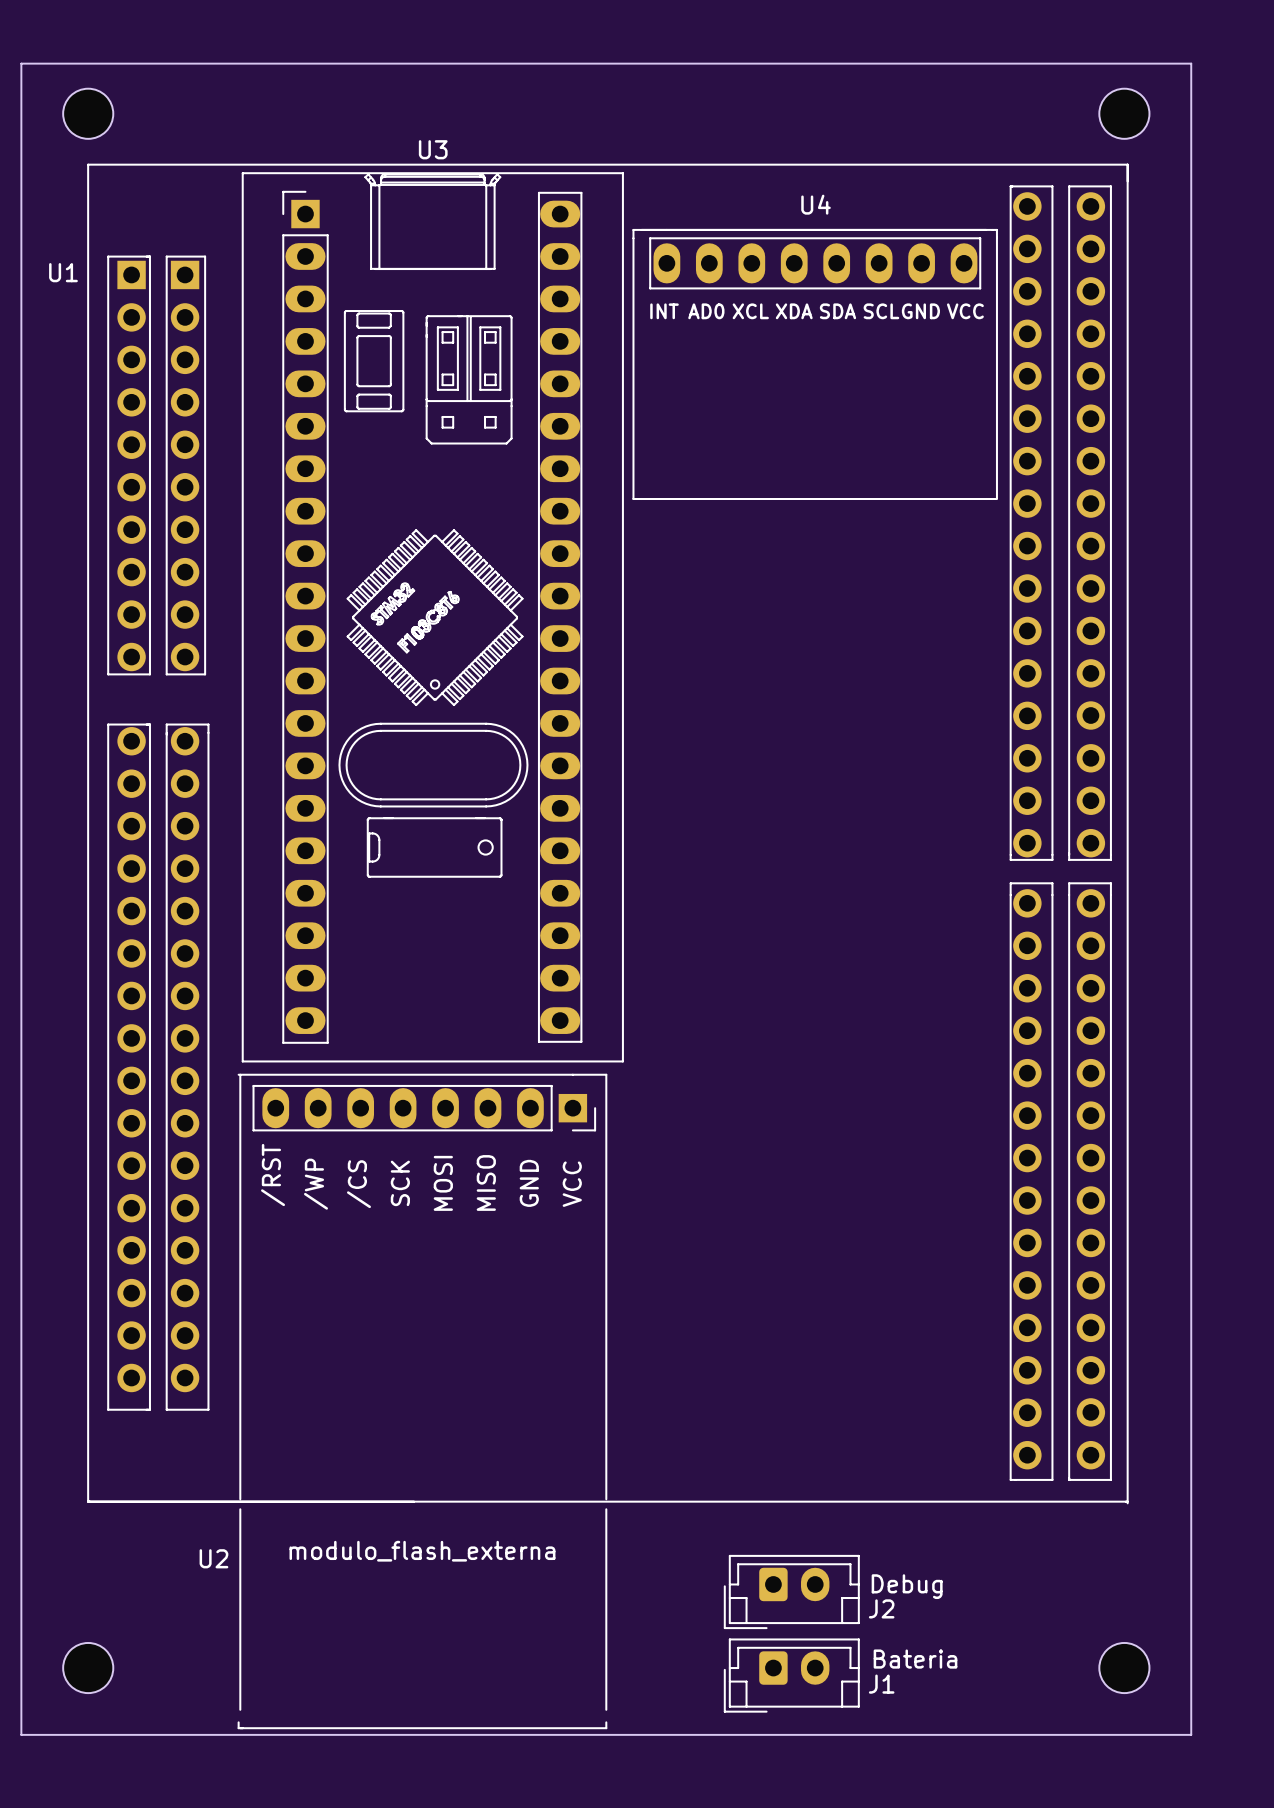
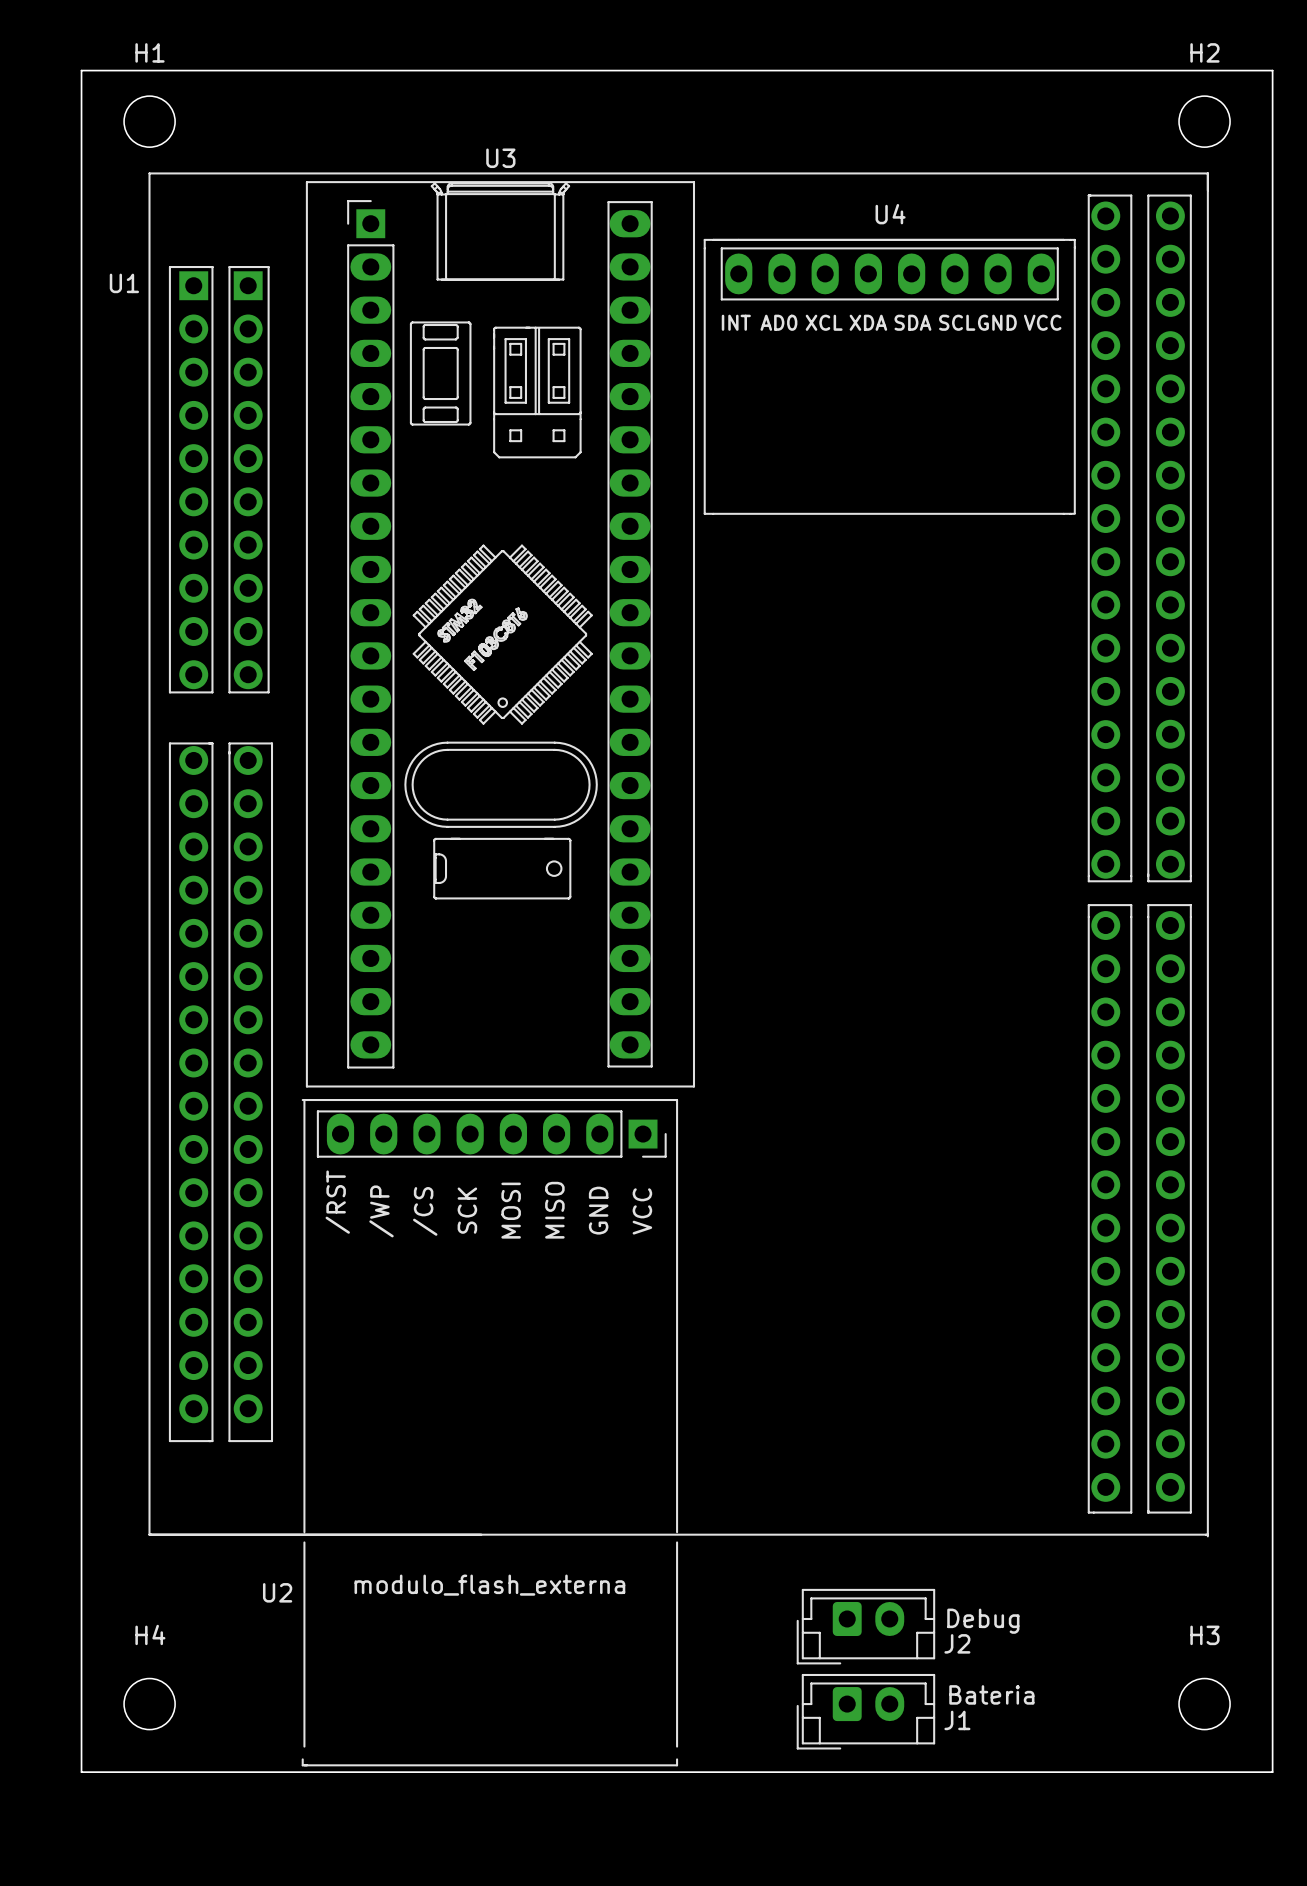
H1 name: none -> H1 (149, 52)
H2 name: none -> H2 (1204, 52)
H4 name: none -> H4 (150, 1634)
H3 name: none -> H3 (1204, 1635)

